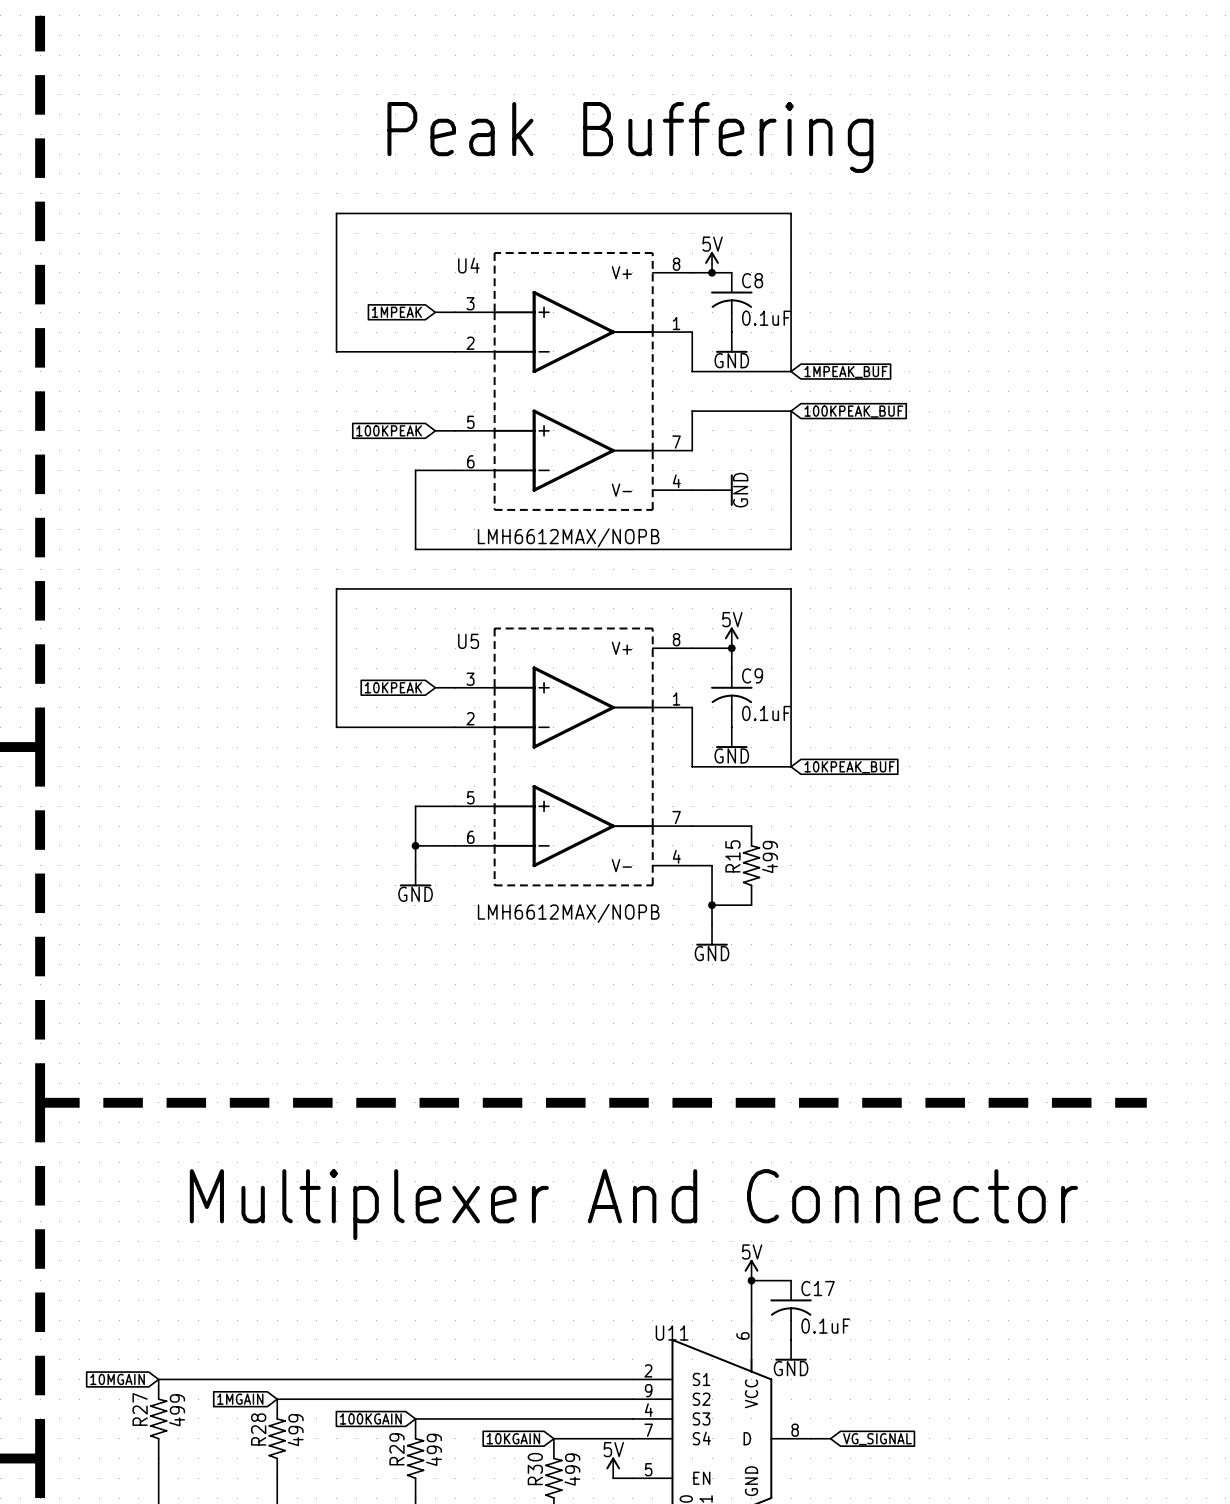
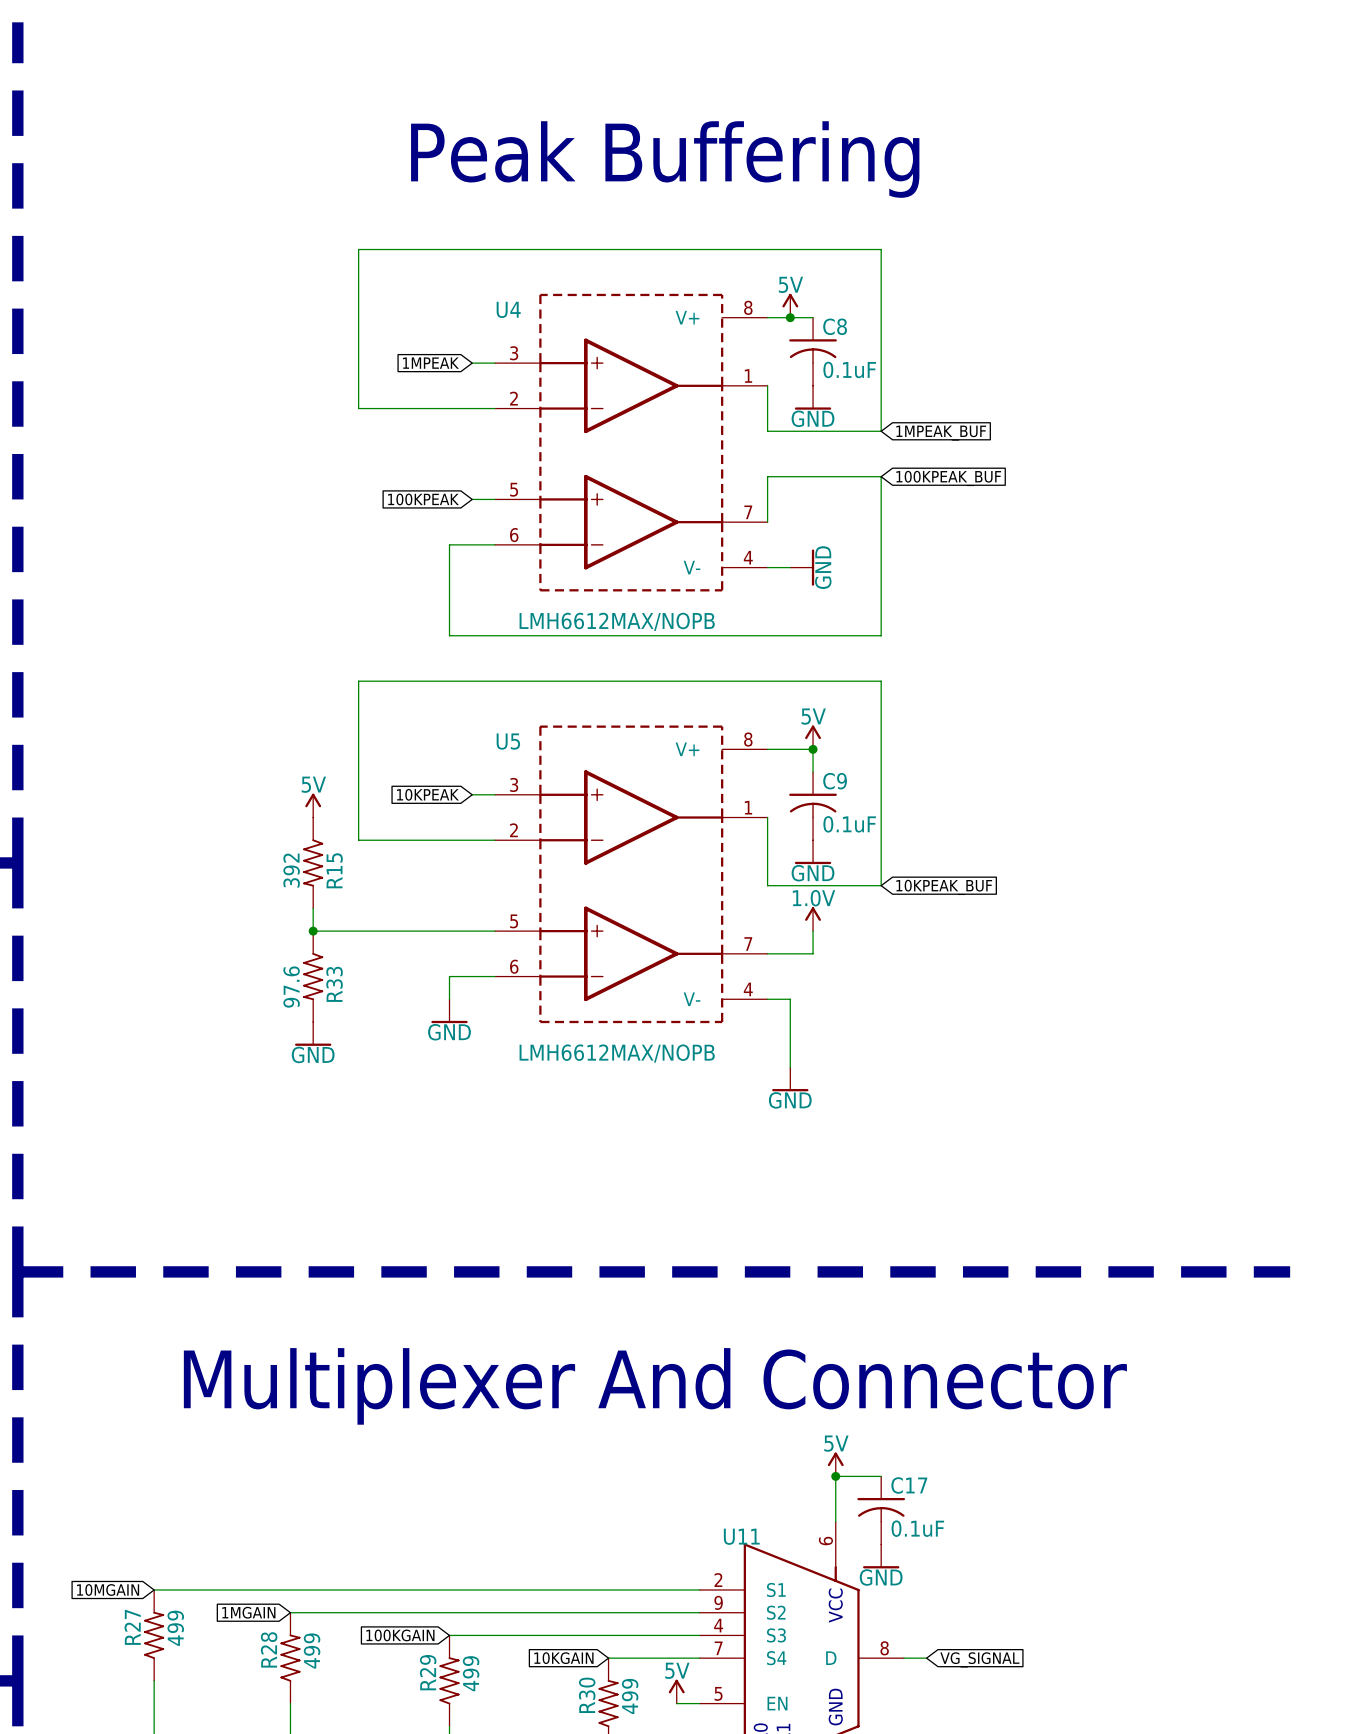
power symbol: none -> 5V (313, 805)
power symbol: none -> 1.0V (813, 919)
junction: none -> (313, 931)
wire: (415, 806) (415, 845) -> (449, 931) (313, 931) (313, 908)
wire: (731, 826) (751, 826) -> (813, 953) (813, 931)
R33: none -> 97.6 (313, 976)
junction: (415, 845) -> none
R15 value: 499 (769, 857) -> 392 (291, 870)
R15 rotation: 0° (751, 865) -> 180° (313, 862)
R15 position: (751, 865) -> (313, 862)
power symbol: none -> GND (313, 1033)
wire: (712, 905) (751, 905) -> none
junction: (712, 905) -> none

